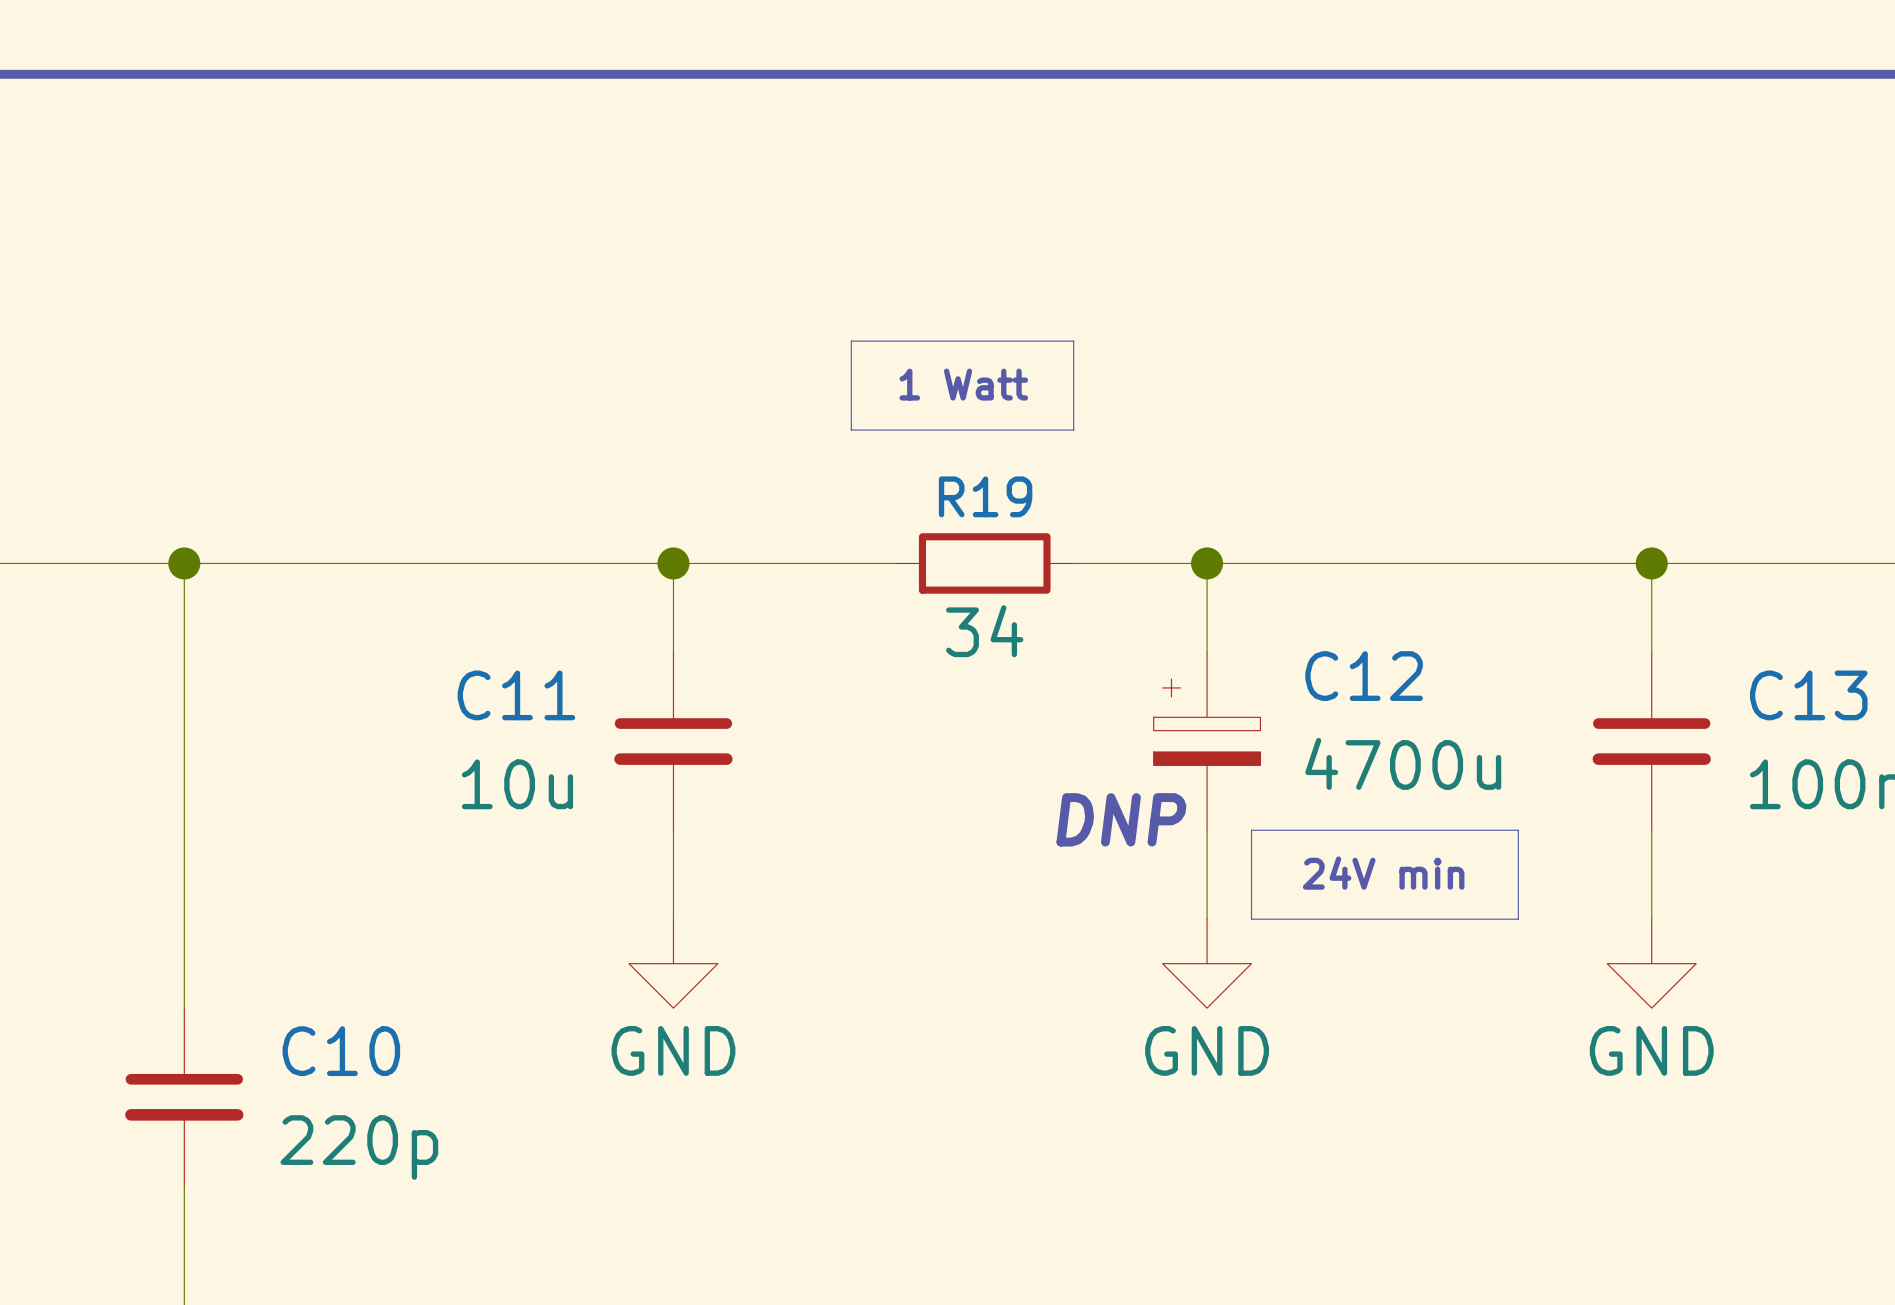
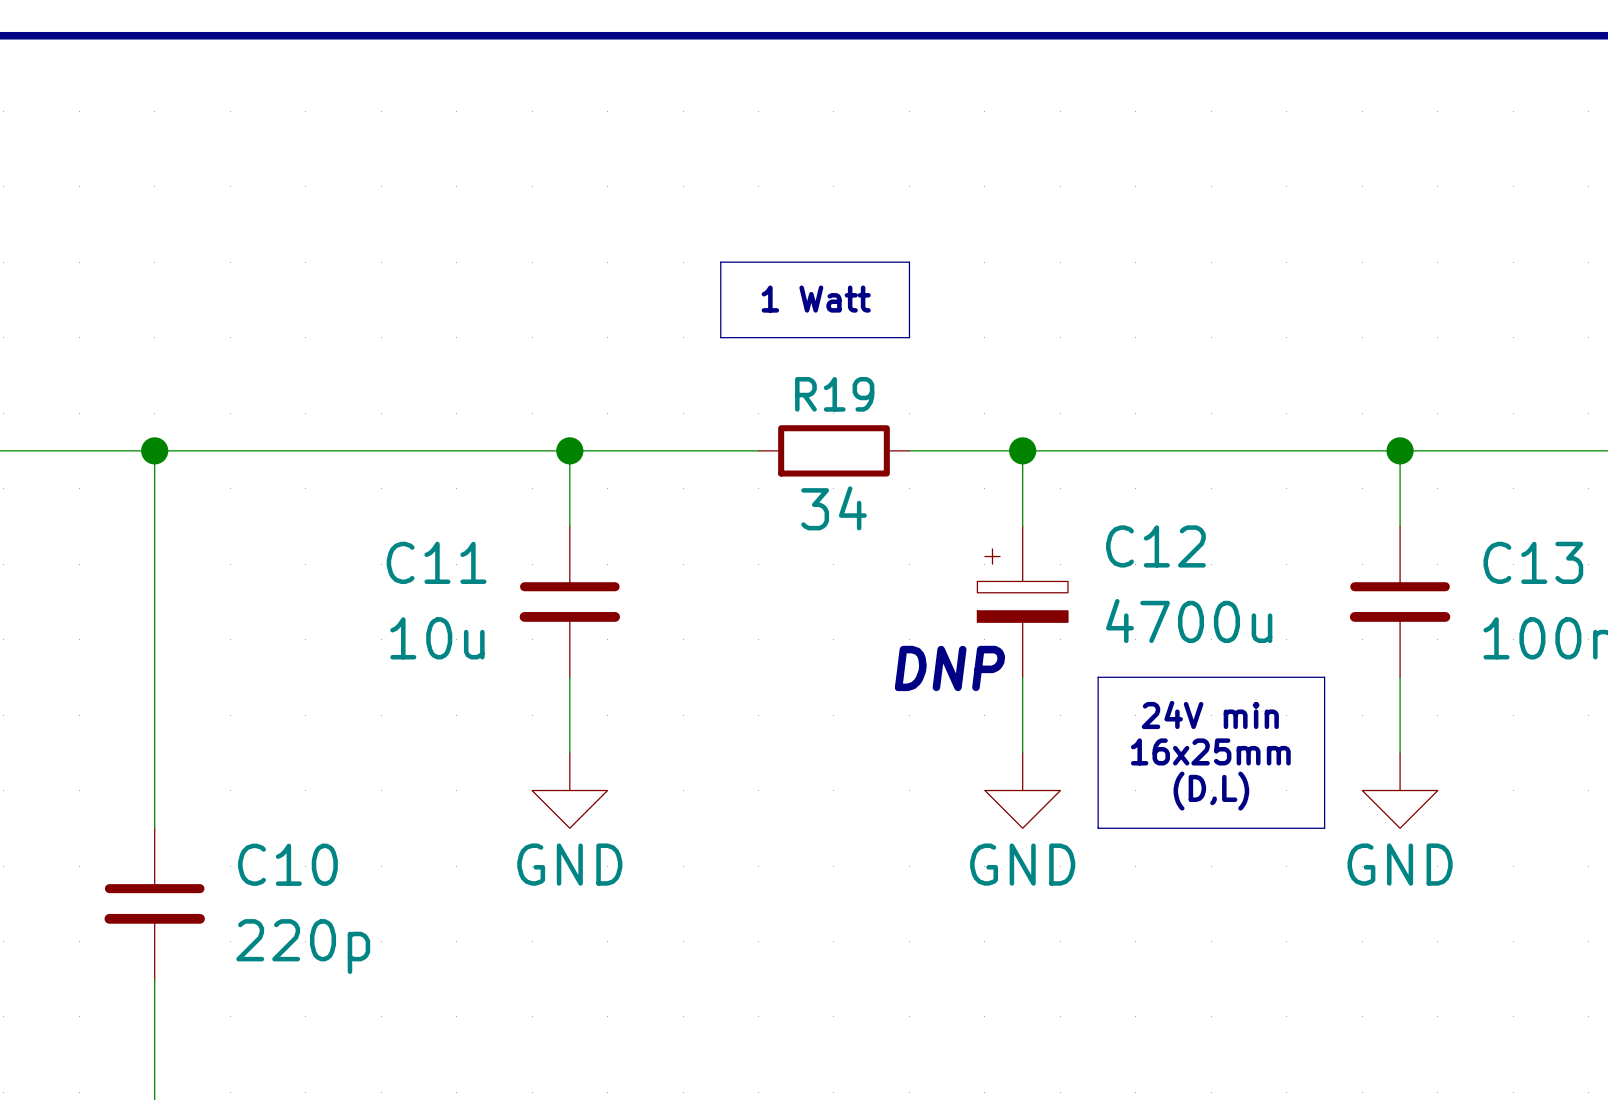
line: (1296, 830) (1251, 830) (1251, 919) (1518, 919) (1518, 830) -> (1098, 677) (1098, 828) (1324, 828) (1324, 677) (1286, 677)
text position: 24V min (1383, 873) -> 24V min (1210, 714)
text: none -> 16x25mm (1210, 751)
text: none -> (D,L) (1211, 791)

